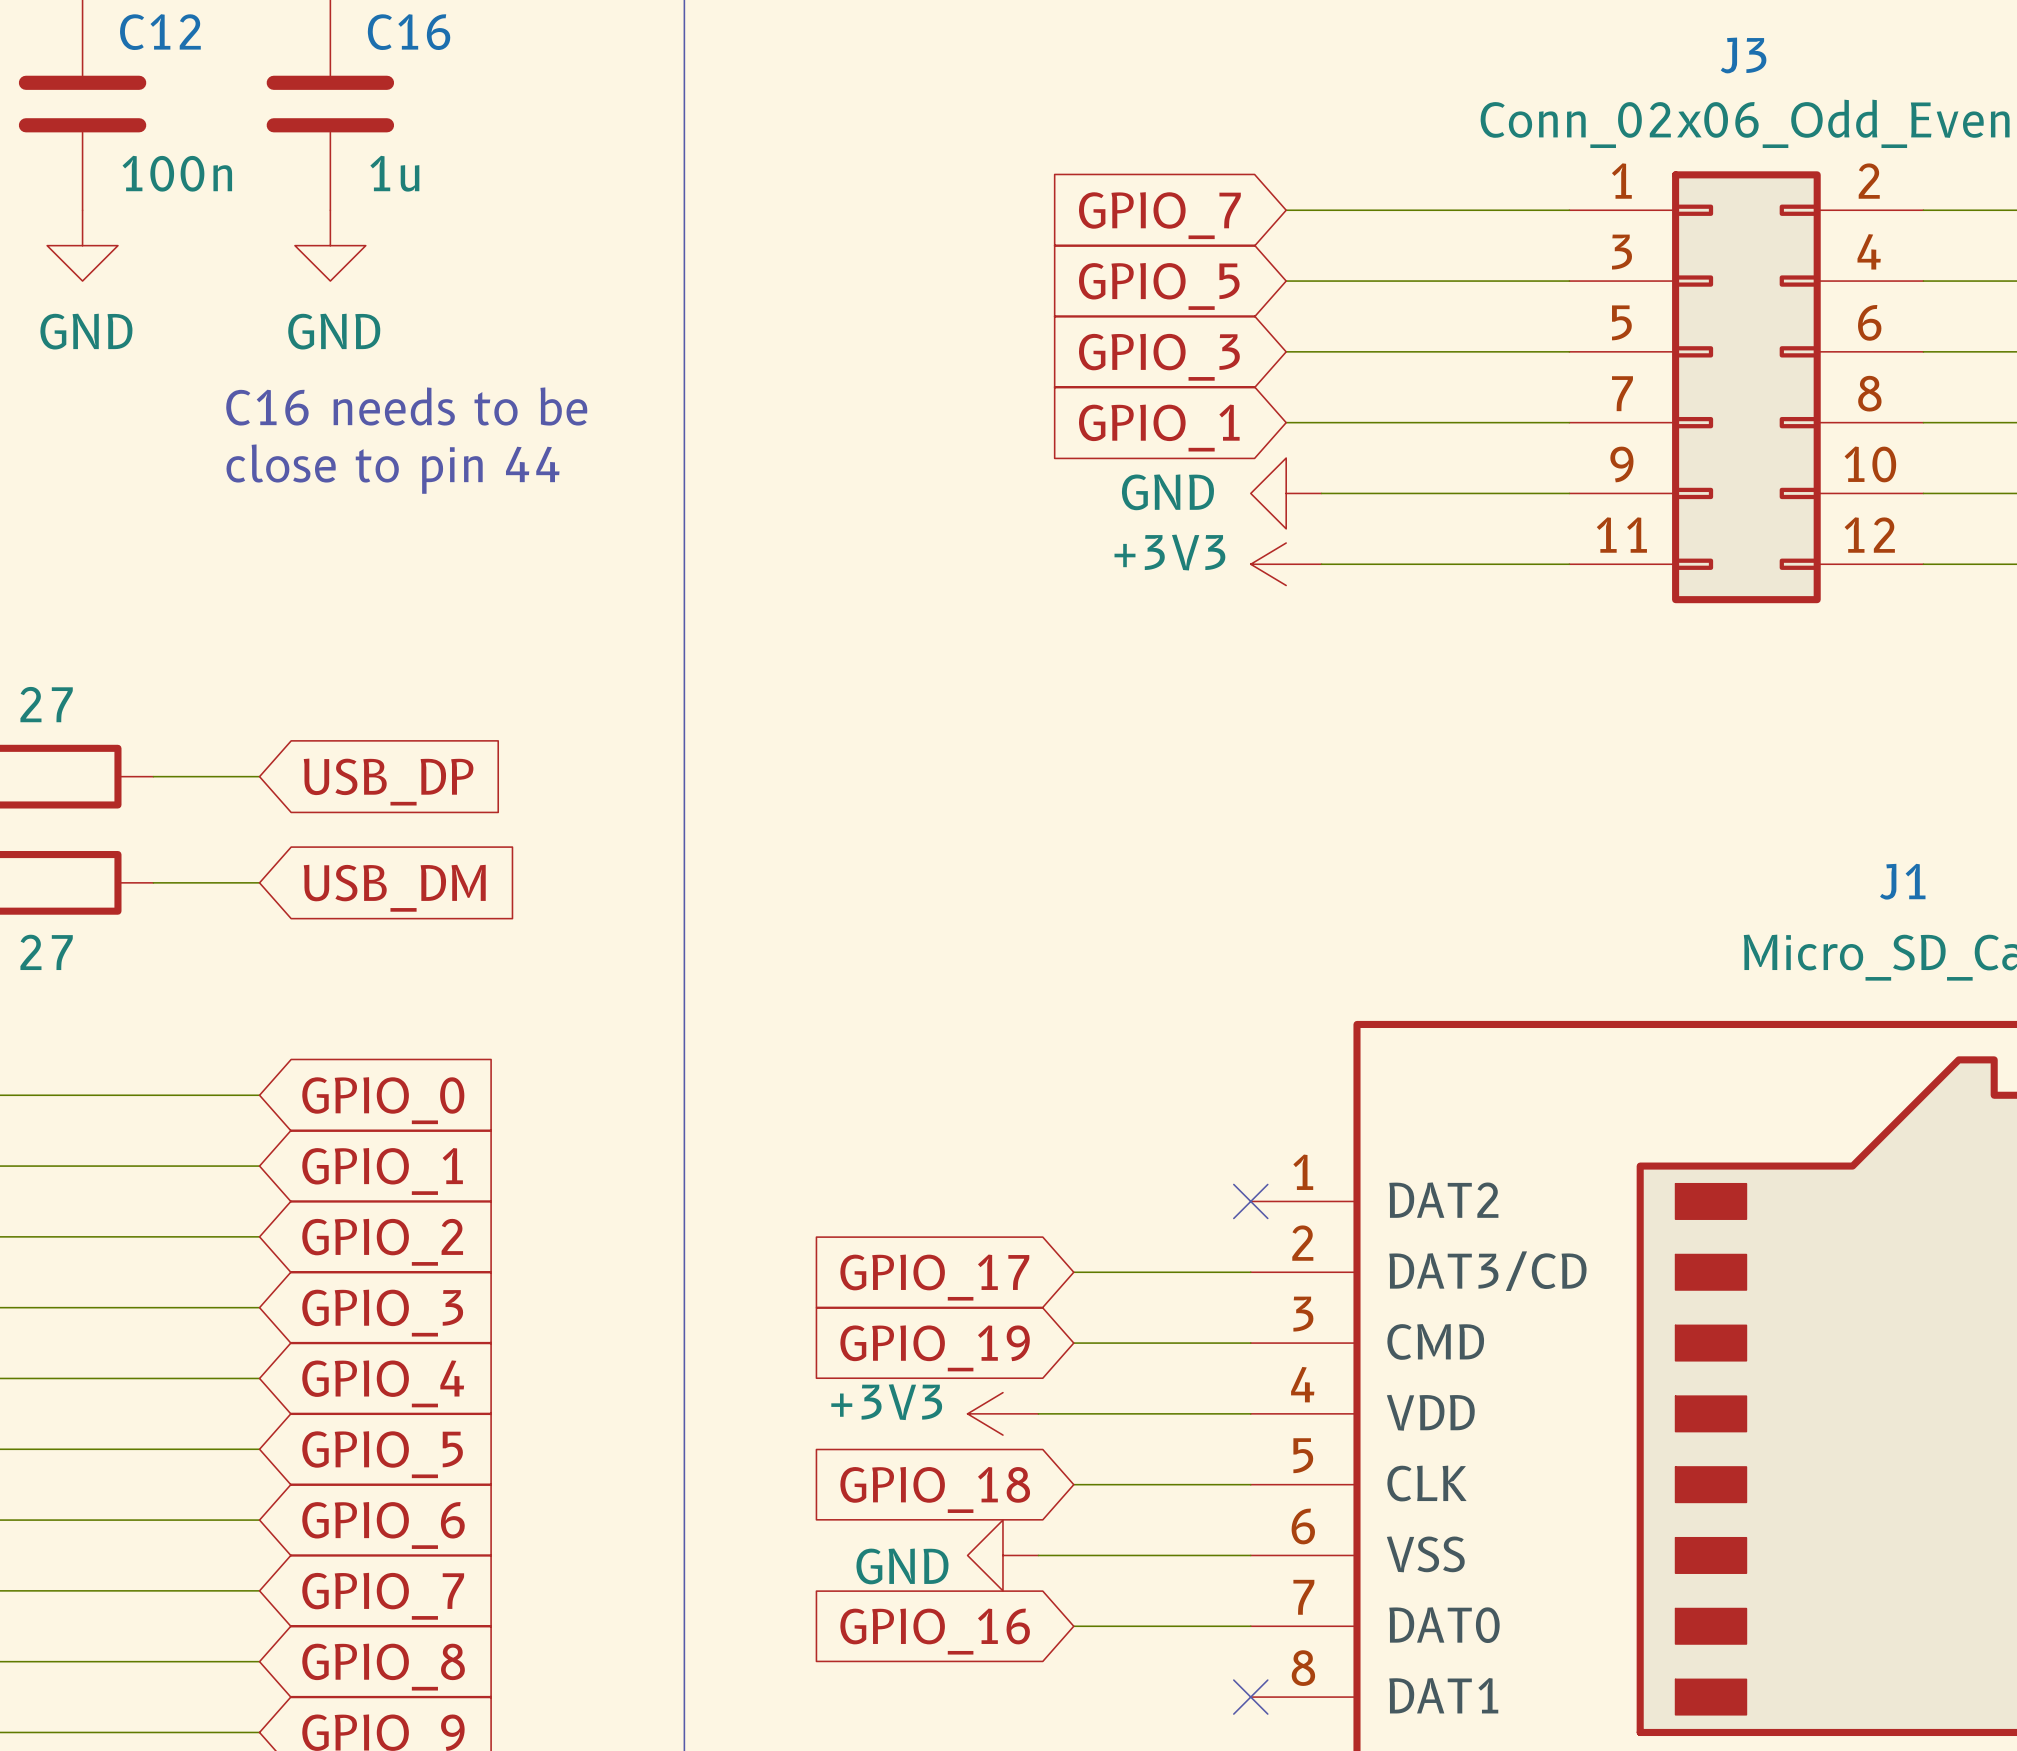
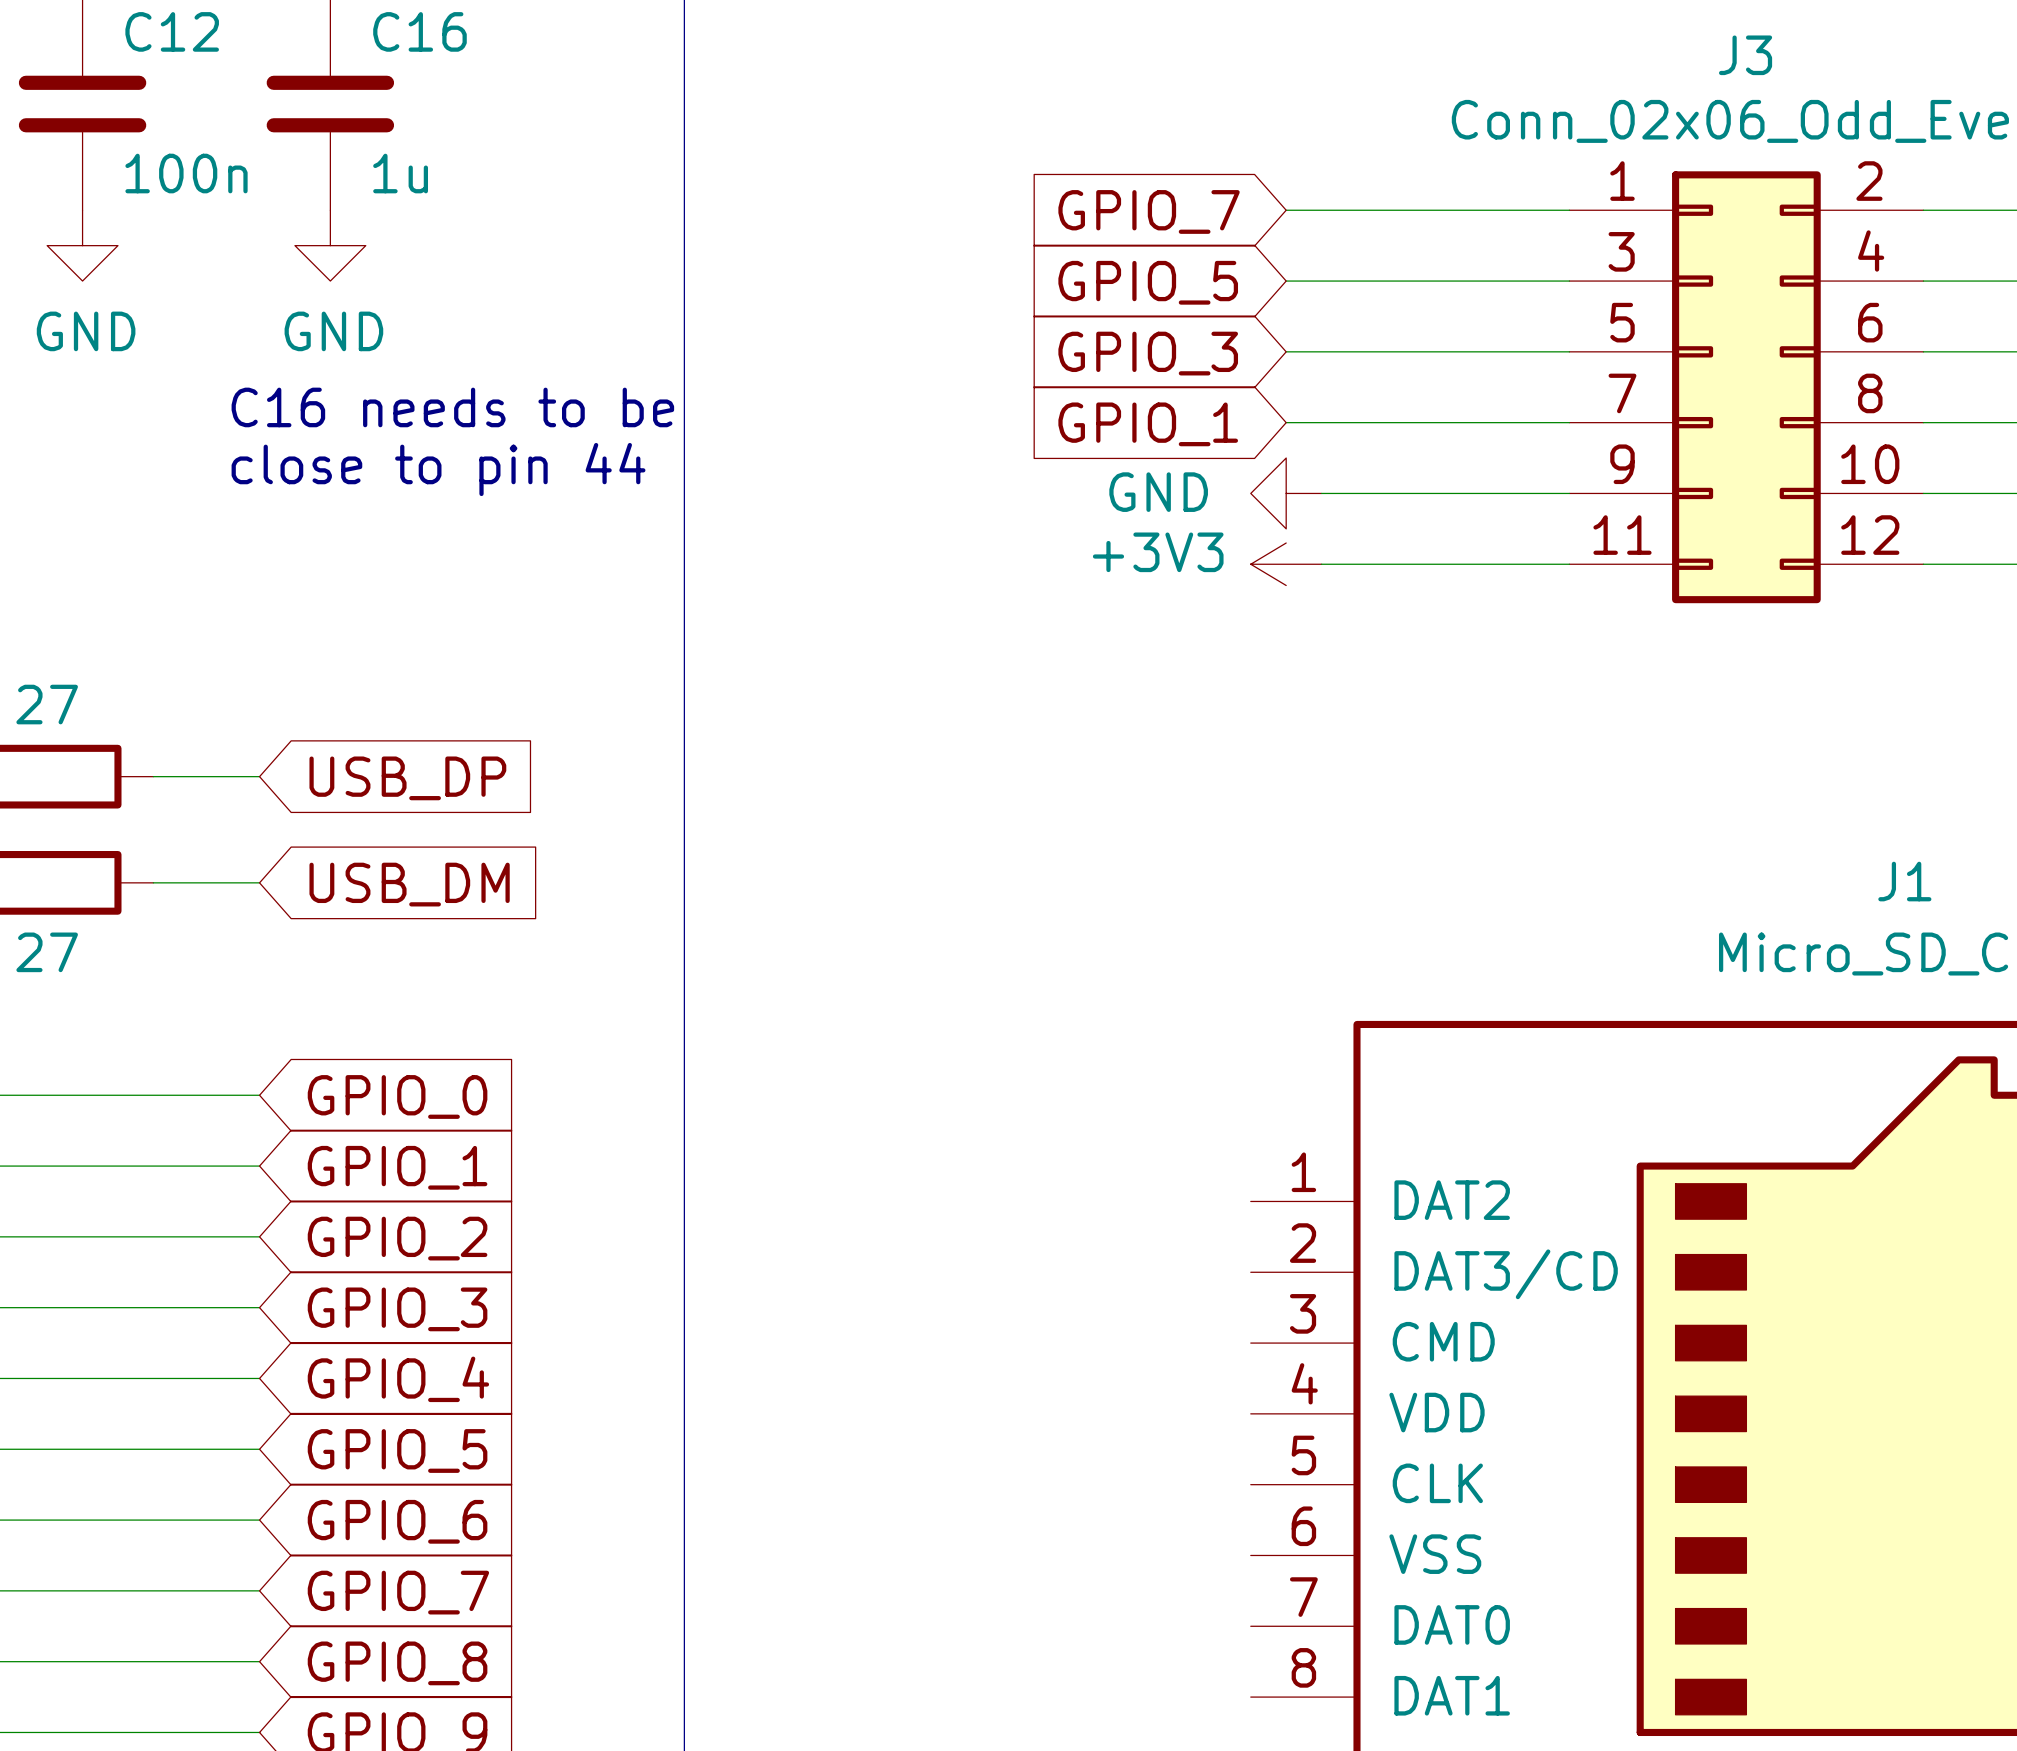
no-connect mark: (1250, 1201) -> none
wire: (1073, 1272) (1250, 1272) -> none
global label: GPIO_17 (934, 1277) -> none
wire: (1073, 1343) (1250, 1343) -> none
global label: GPIO_19 (935, 1348) -> none
power symbol: +3V3 (1002, 1413) -> none
wire: (1038, 1413) (1250, 1413) -> none
wire: (1073, 1484) (1250, 1484) -> none
global label: GPIO_18 (935, 1489) -> none
power symbol: GND (1002, 1555) -> none
wire: (1038, 1555) (1250, 1555) -> none
wire: (1073, 1626) (1250, 1626) -> none
global label: GPIO_16 (935, 1631) -> none
no-connect mark: (1250, 1697) -> none

